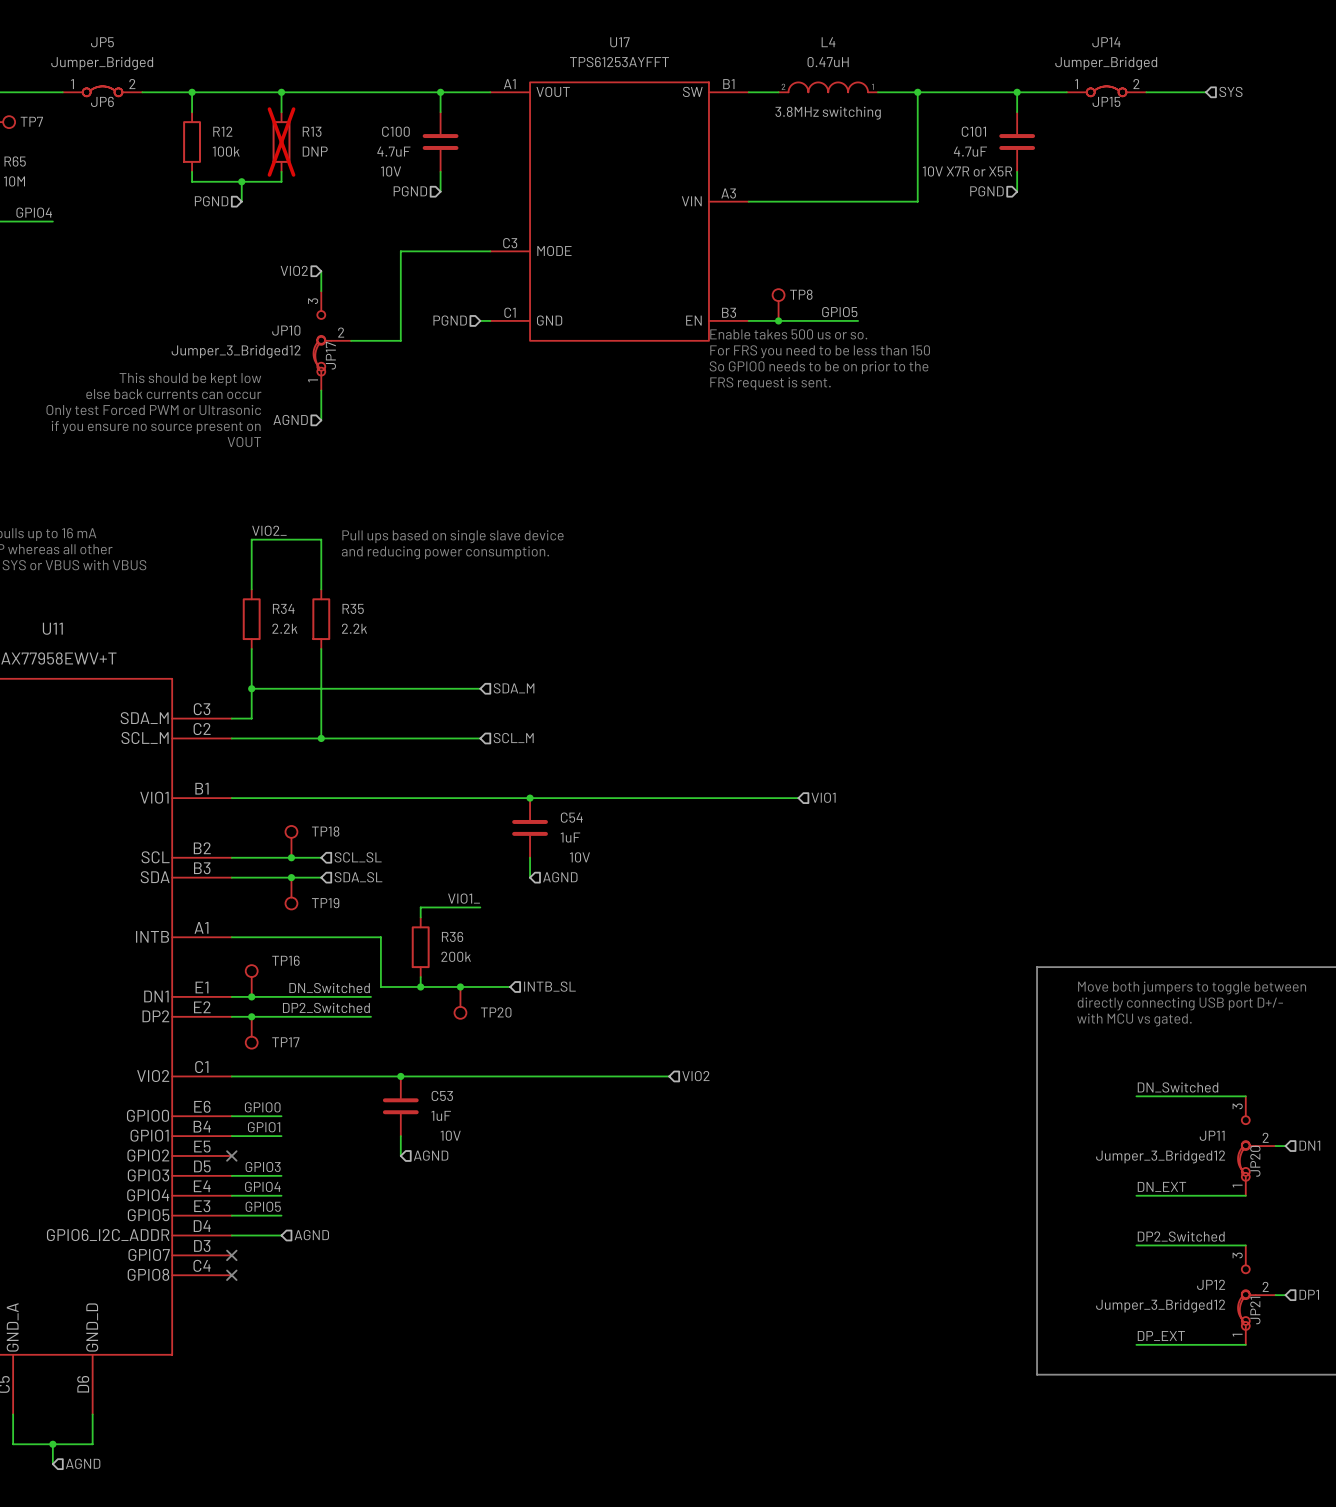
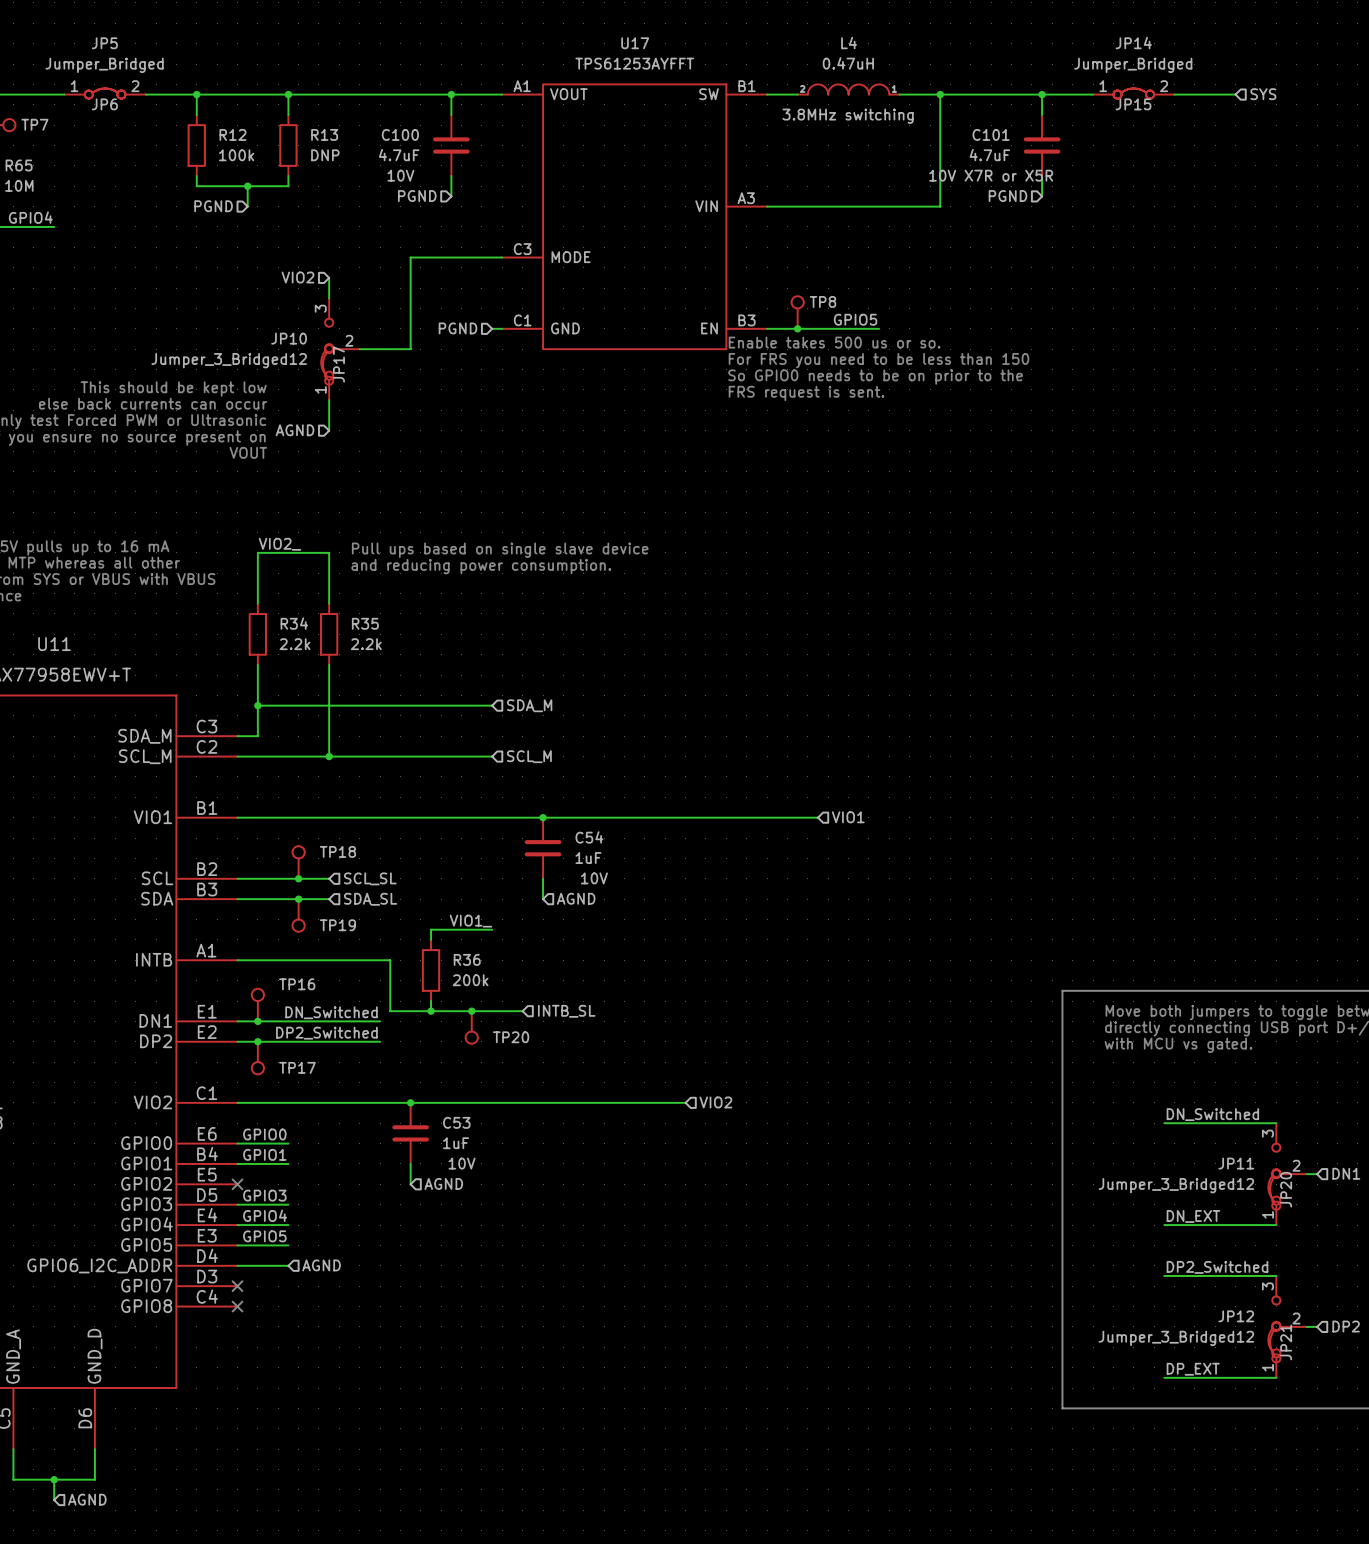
R13 do-not-place cross: (281, 142) -> none
hierarchical label: DP1 (1309, 1294) -> DP2 (1346, 1326)

